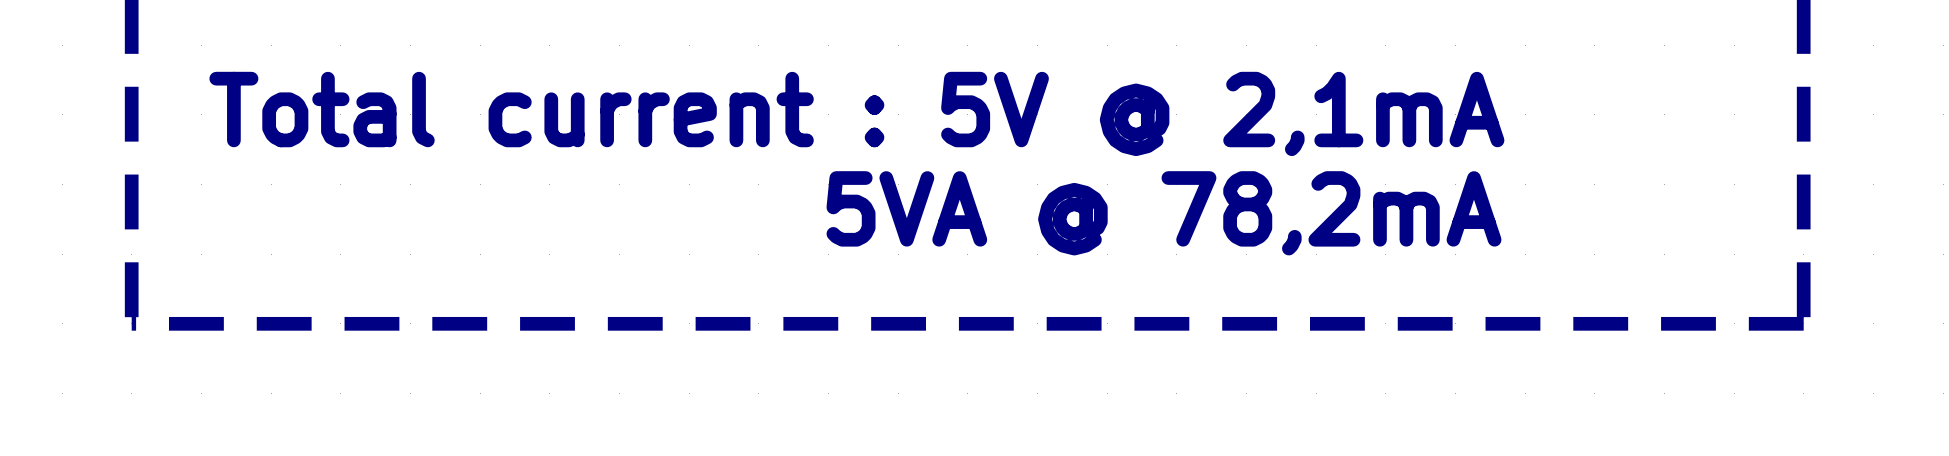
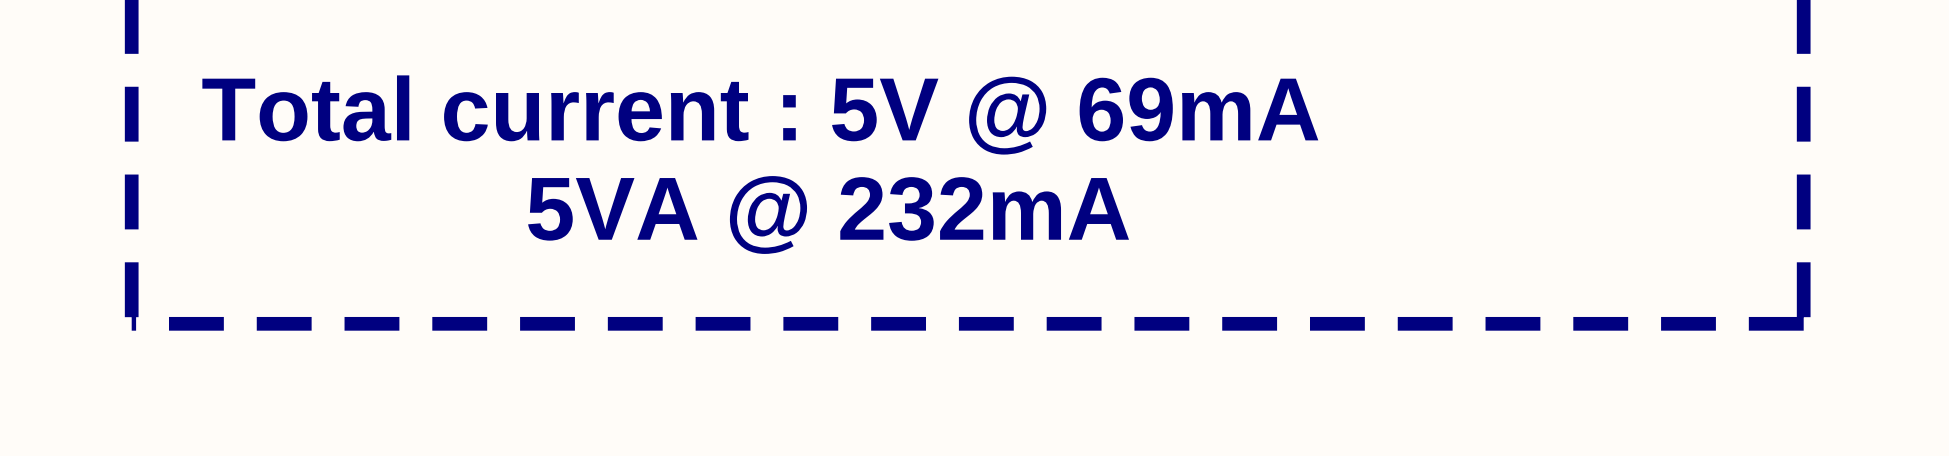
text: Total current : 5V @ 2,1mA (856, 113) -> Total current : 5V @ 69mA (760, 114)
text: 5VA @ 78,2mA (1163, 213) -> 5VA @ 232mA (828, 215)

